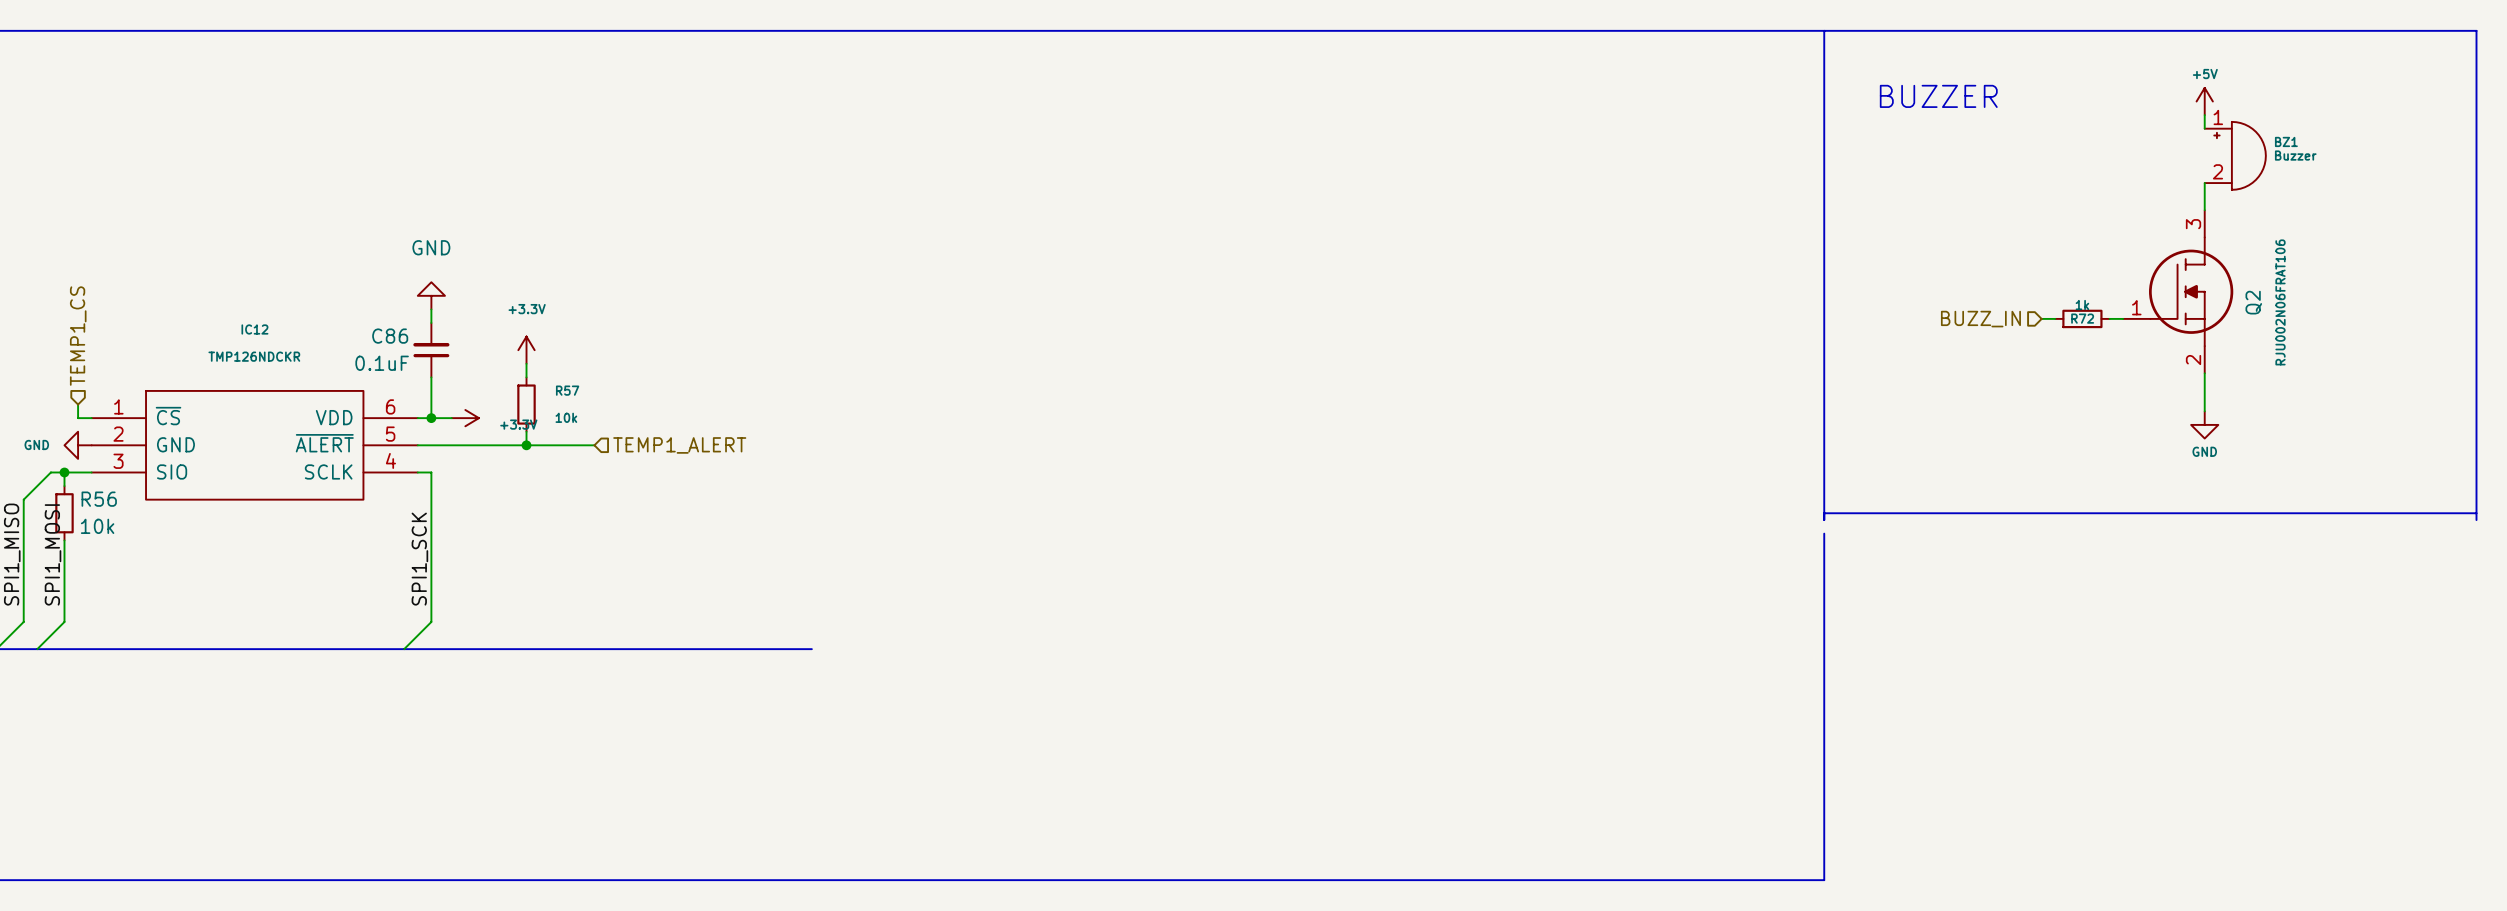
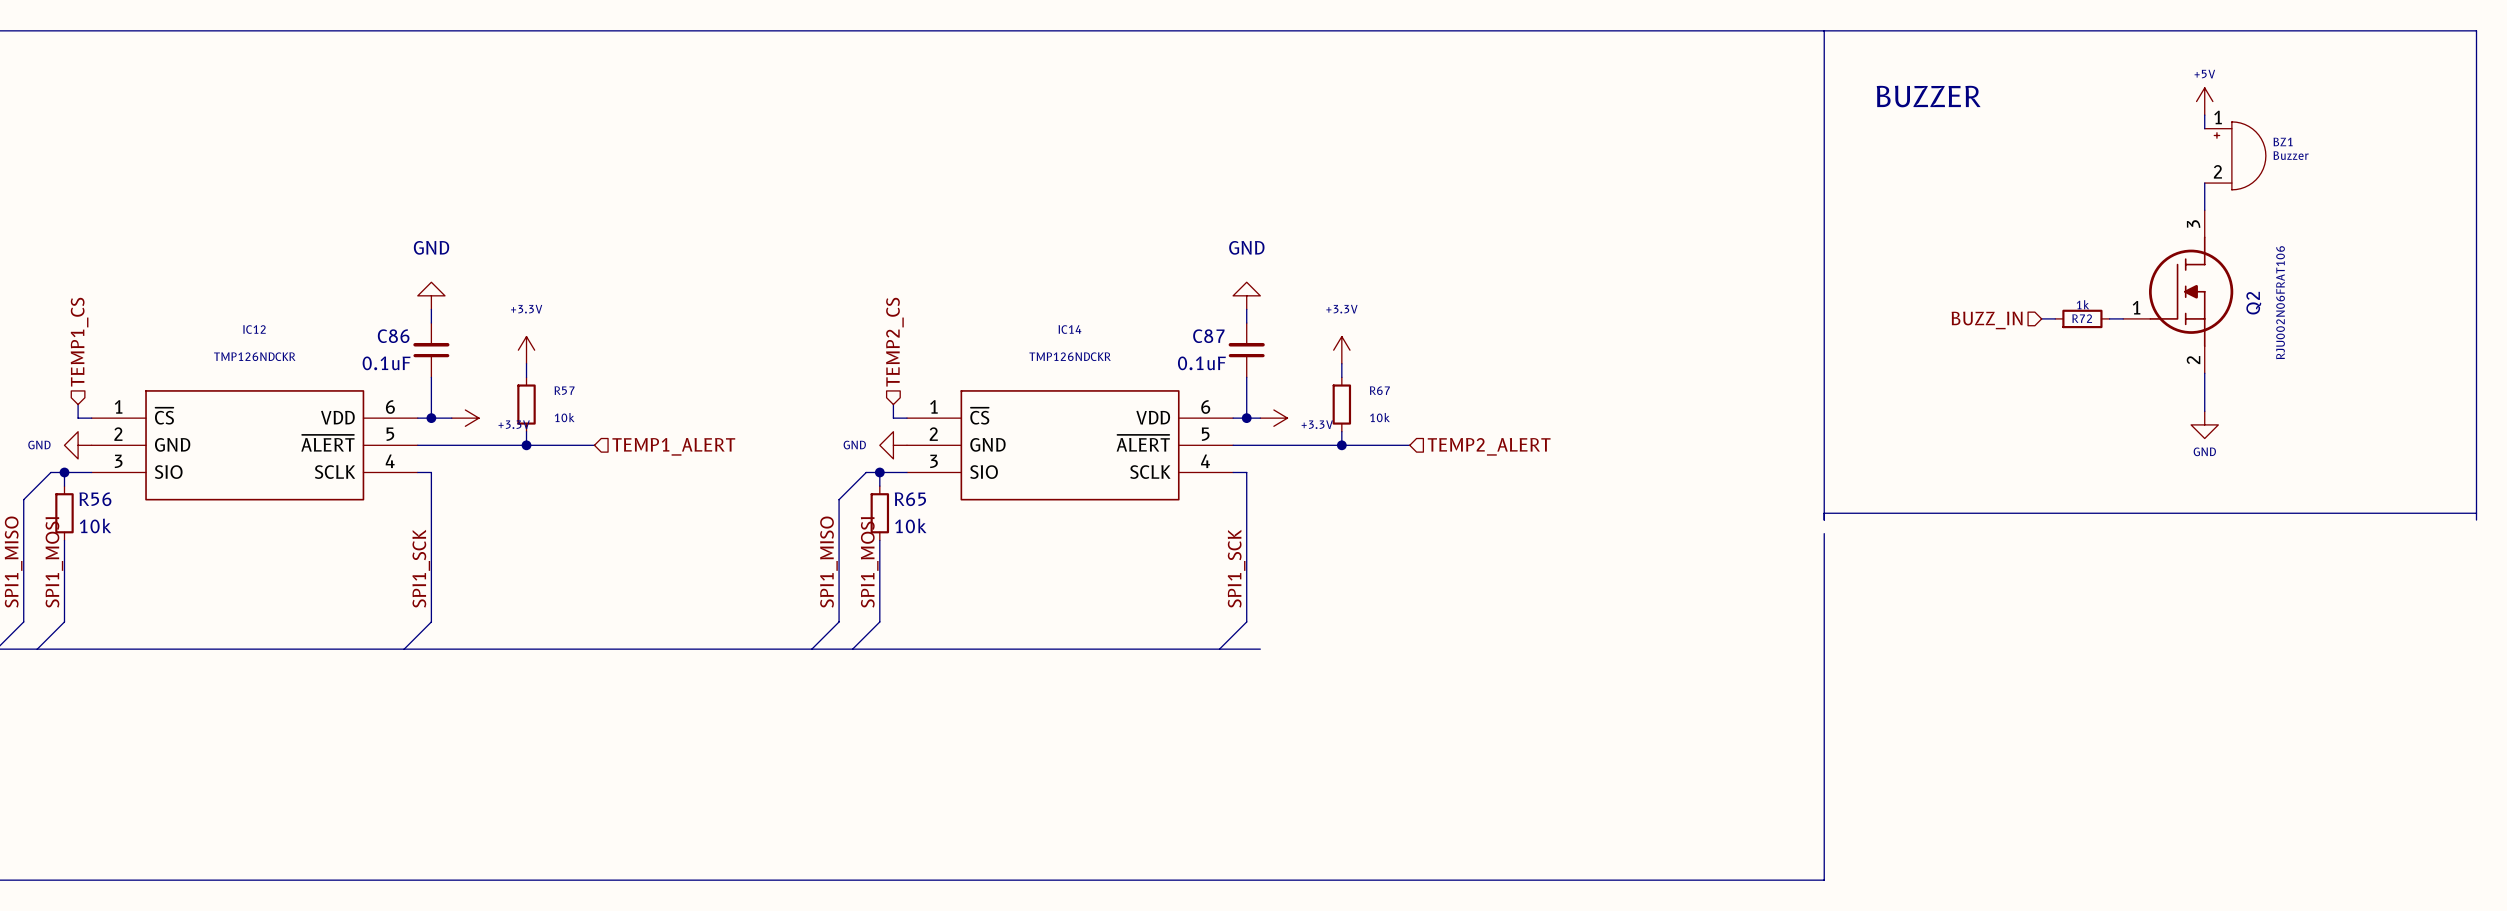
power symbol: none -> GND (1246, 295)
wire: none -> (1246, 309) (1246, 323)
hierarchical label: none -> TEMP2_CS (894, 342)
C87: none -> 0.1uF (1246, 350)
power symbol: none -> +3.3V (1341, 350)
wire: none -> (1341, 363) (1341, 377)
wire: none -> (1246, 377) (1246, 418)
wire: none -> (893, 404) (893, 418) (906, 418)
R67: none -> 10k (1341, 404)
wire: none -> (1233, 418) (1260, 418)
junction: none -> (1246, 418)
power symbol: none -> +3.3V (1273, 418)
wire: none -> (1341, 431) (1341, 445)
power symbol: none -> GND (893, 445)
IC14: none -> TMP126NDCKR (1070, 445)
wire: none -> (1233, 445) (1409, 445)
junction: none -> (1341, 445)
hierarchical label: none -> TEMP2_ALERT (1489, 446)
wire: none -> (879, 472) (879, 486)
junction: none -> (879, 472)
wire: none -> (906, 472) (866, 472) (839, 499) (839, 621) (811, 649)
wire: none -> (1233, 472) (1246, 472) (1246, 621) (1219, 649)
R65: none -> 10k (879, 513)
wire: none -> (879, 540) (879, 621) (852, 649)
label: none -> SPI1_MISO (828, 562)
label: none -> SPI1_MOSI (869, 562)
label: none -> SPI1_SCK (1236, 568)
bus: none -> (811, 649) (1260, 649)

